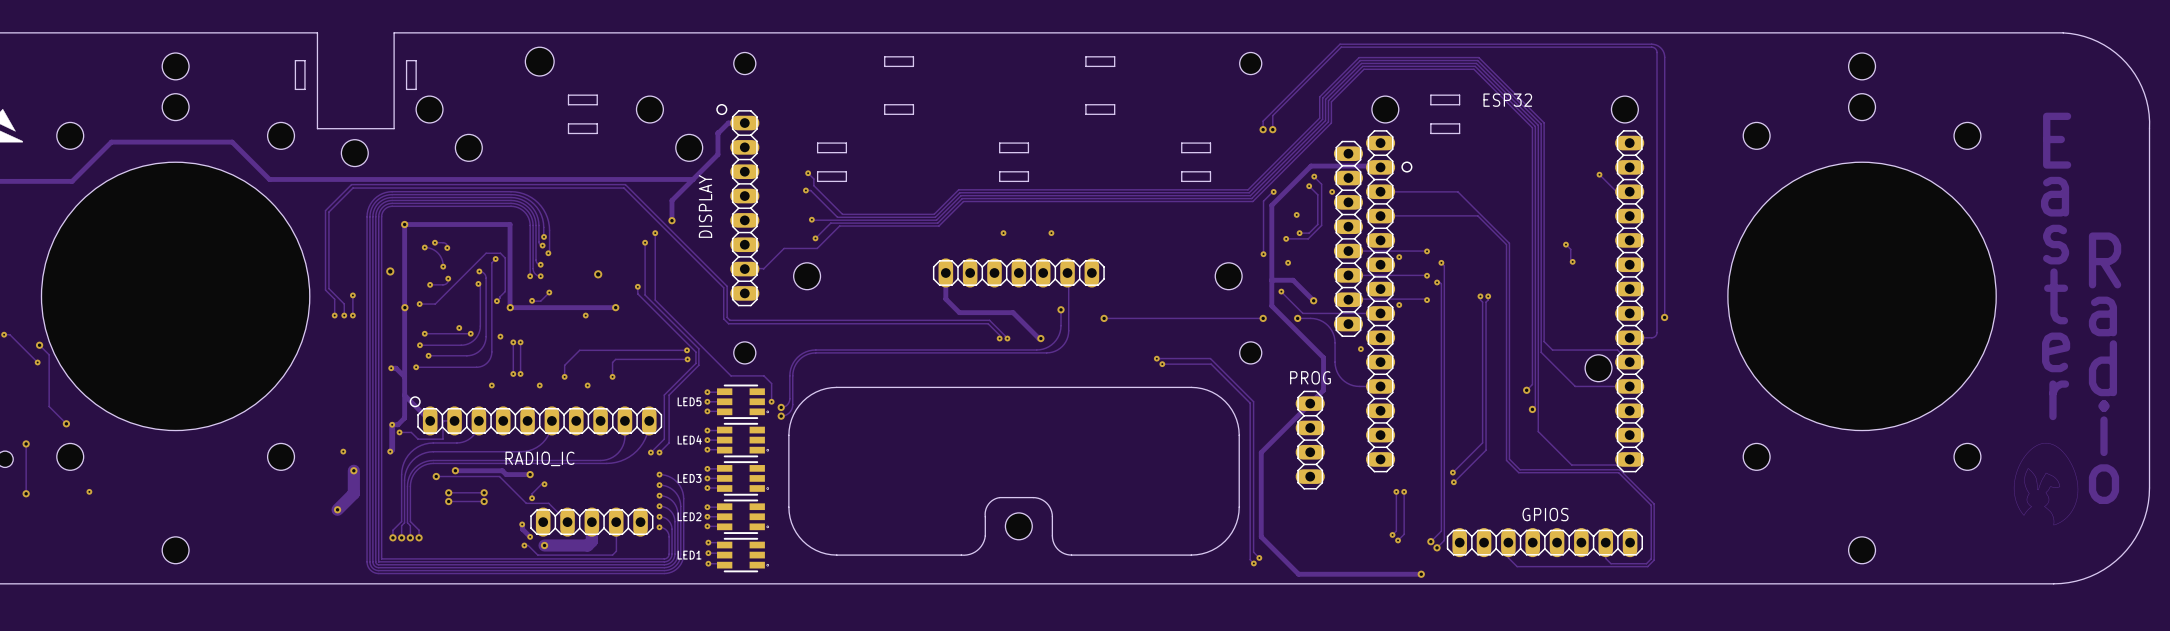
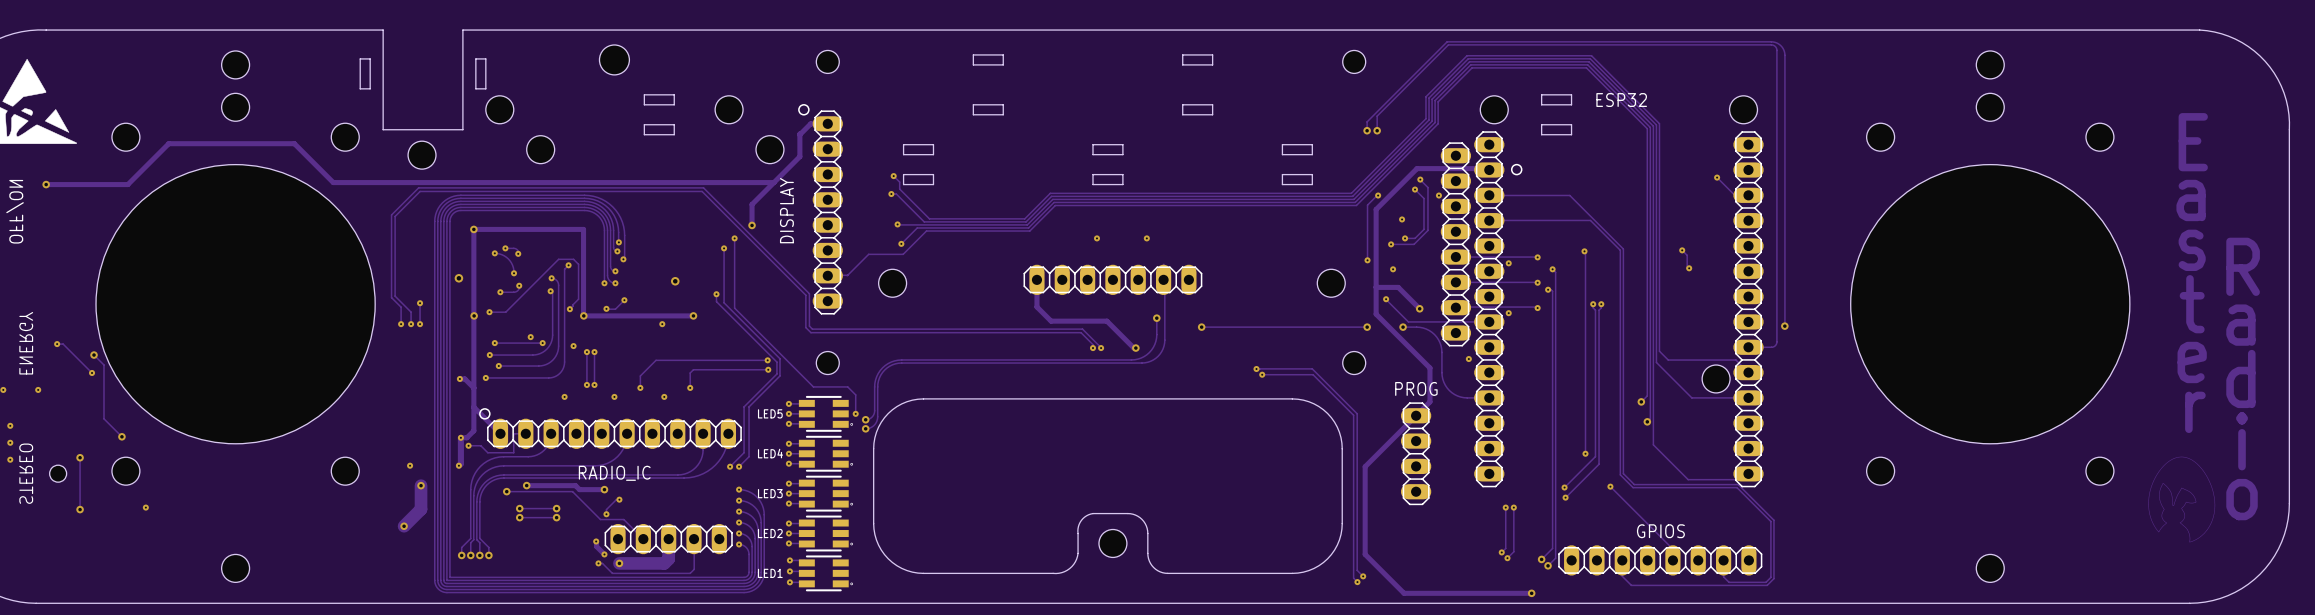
track: none -> (1584, 251) (1585, 453)
via: none -> (1584, 251)
via: none -> (1585, 453)
track: none -> (1610, 486) (1672, 549) (1672, 560)
via: none -> (1610, 486)

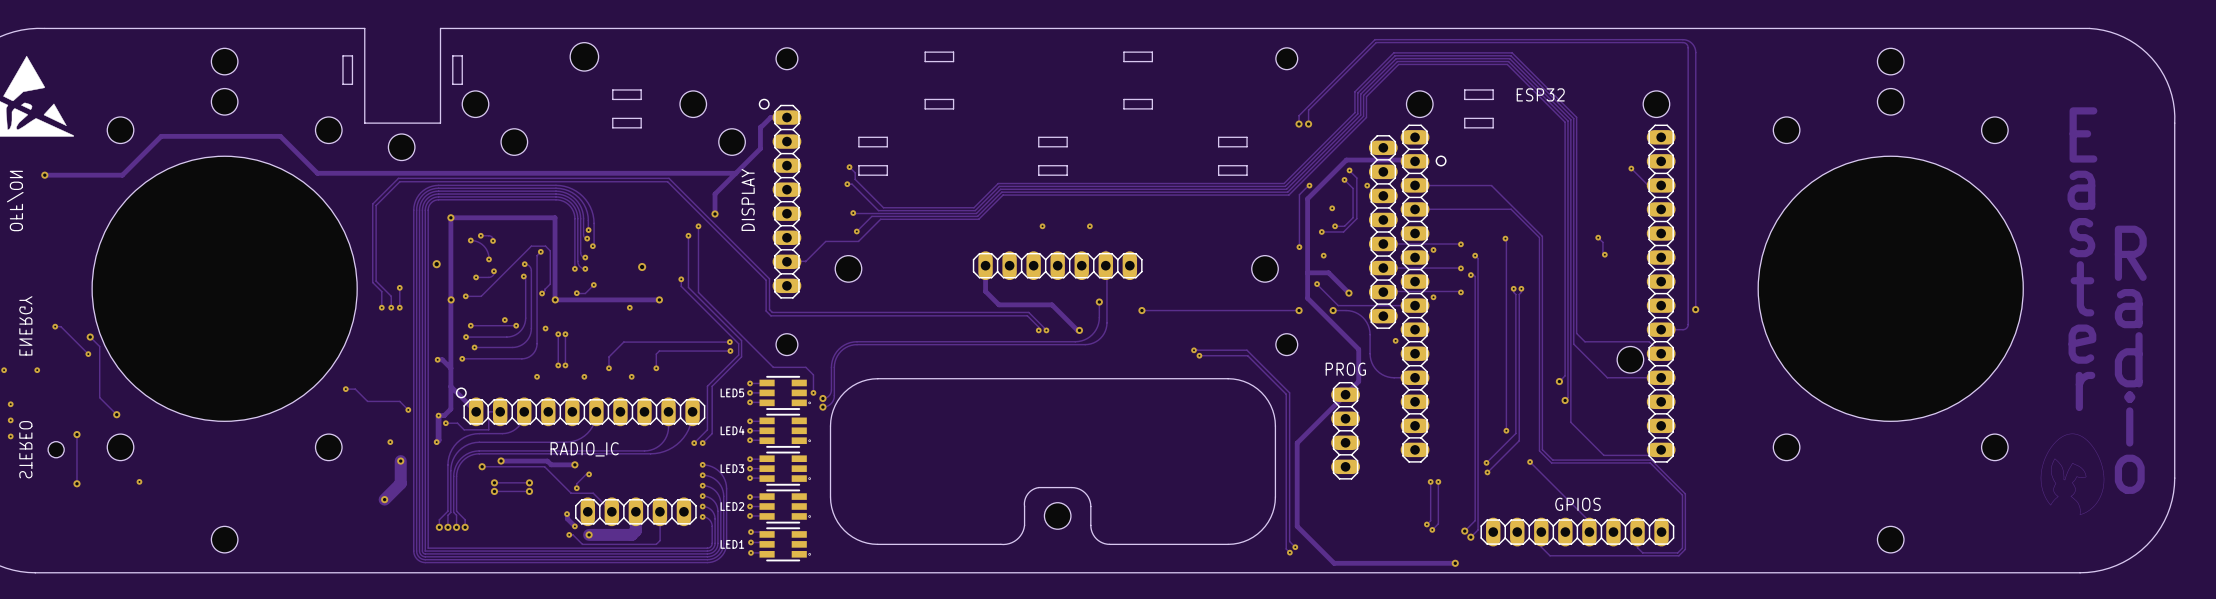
track: none -> (345, 389) (355, 389) (367, 401) (399, 401) (408, 409)
via: none -> (345, 389)
via: none -> (408, 409)

